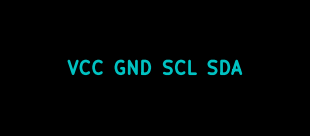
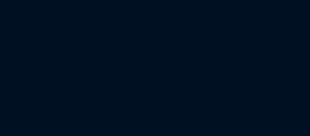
text: VCC GND SCL SDA (154, 67) -> none

